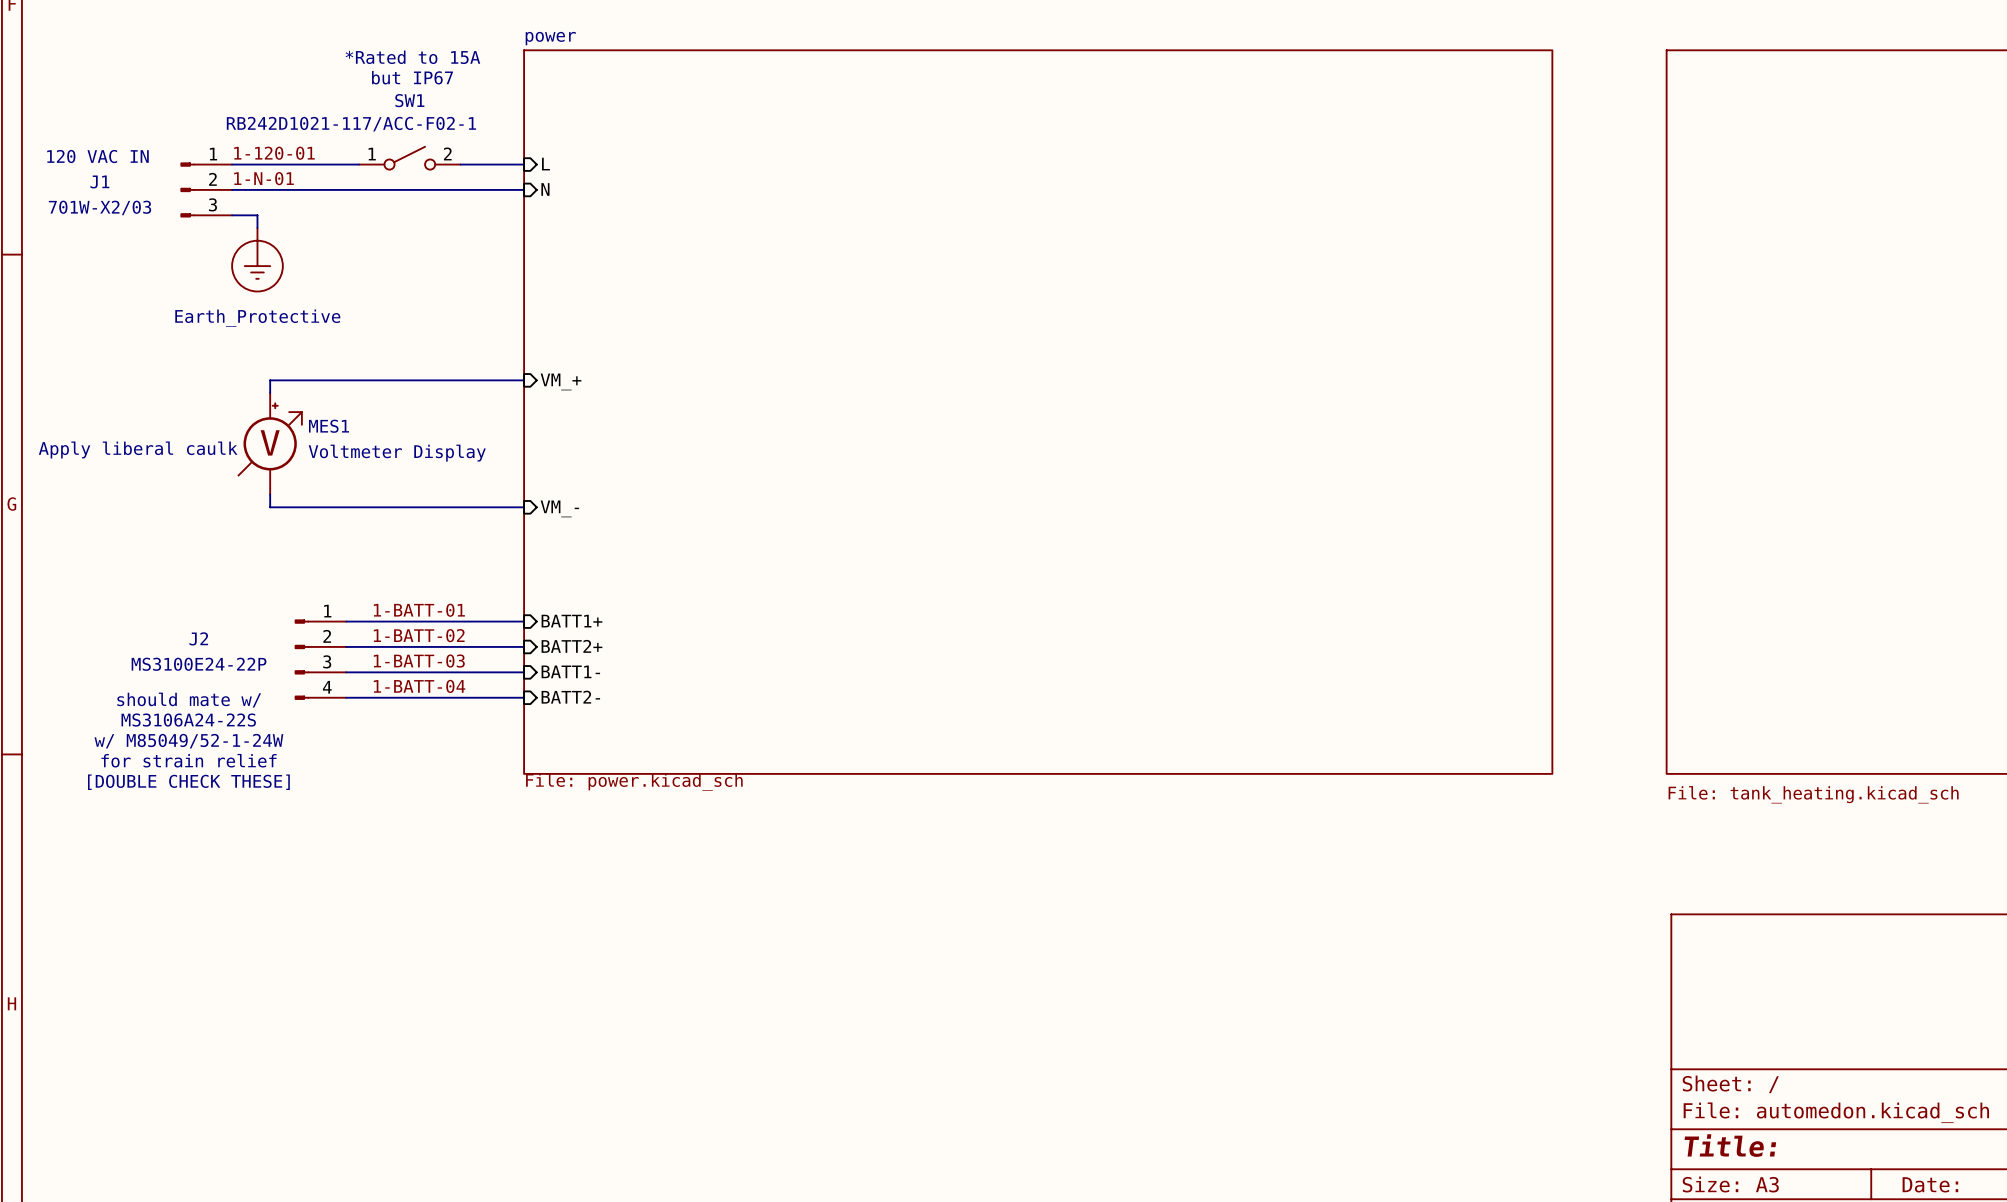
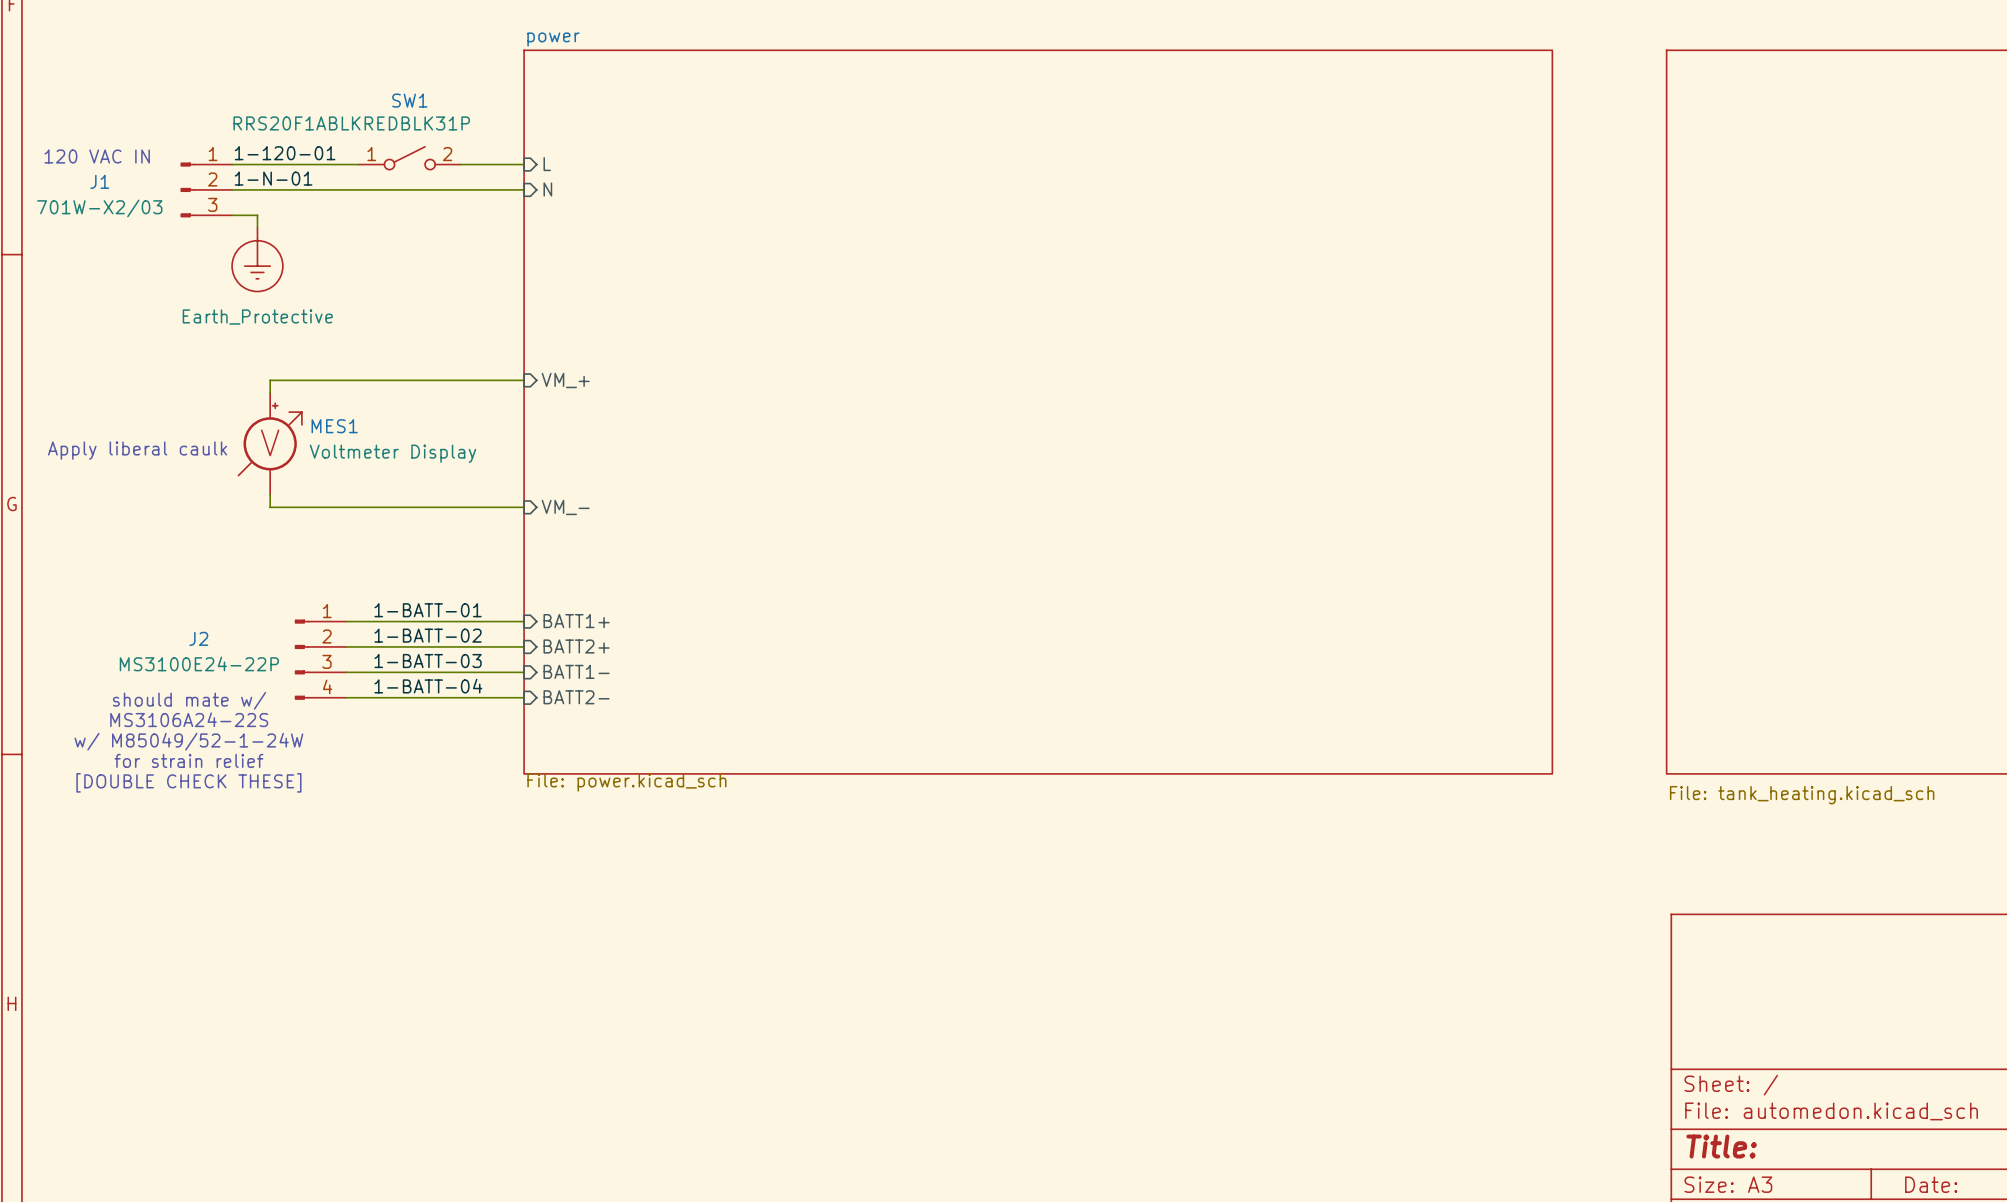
text: *Rated to 15A (412, 57) -> none
text: but IP67 (412, 77) -> none
SW1 value: RB242D1021-117/ACC-F02-1 (351, 124) -> RRS20F1ABLKREDBLK31P (351, 123)

